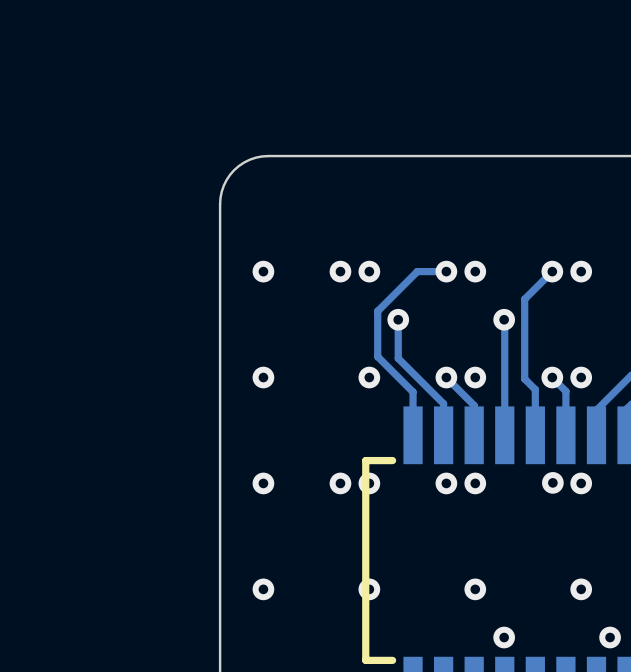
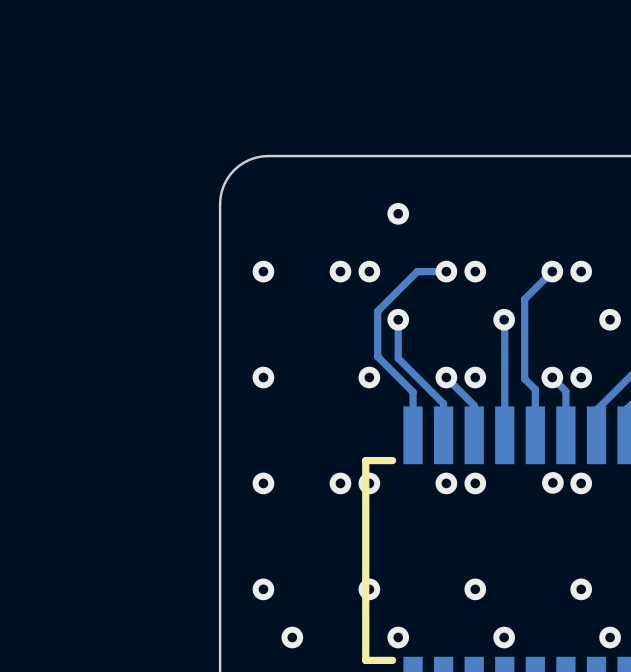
via: none -> (398, 213)
via: none -> (610, 319)
via: none -> (292, 637)
via: none -> (398, 637)

